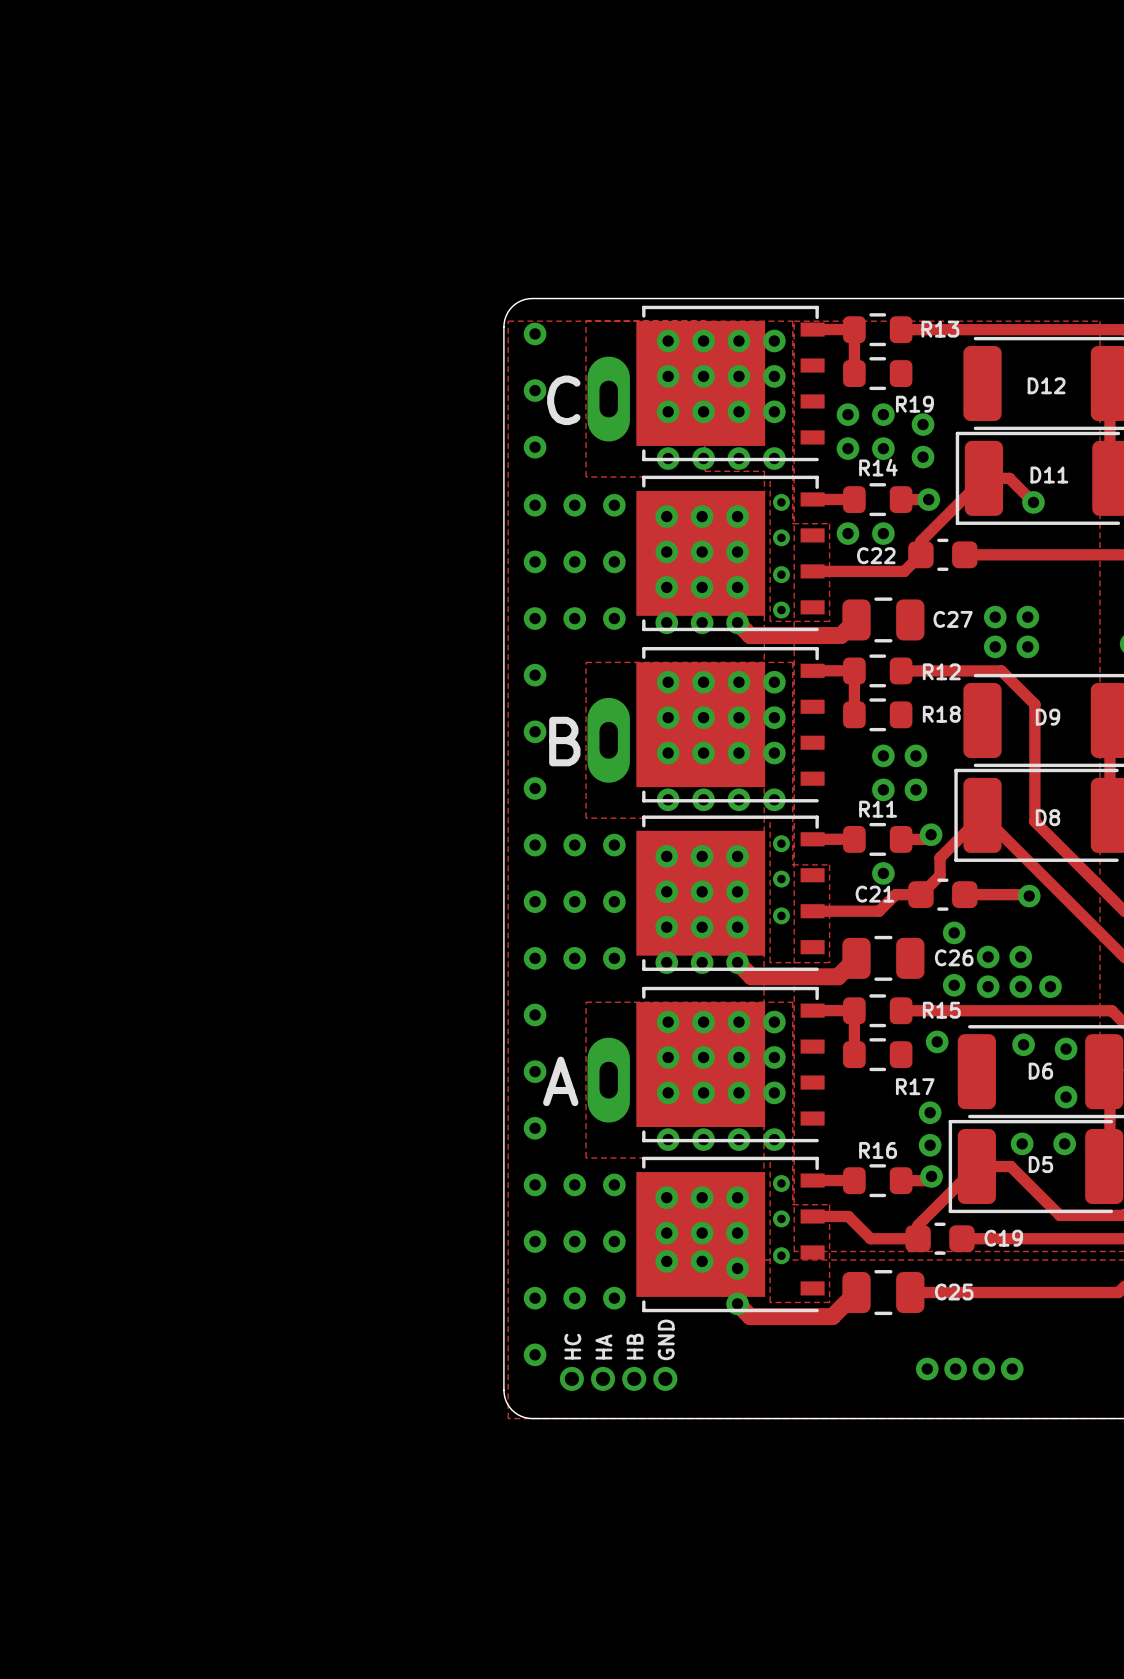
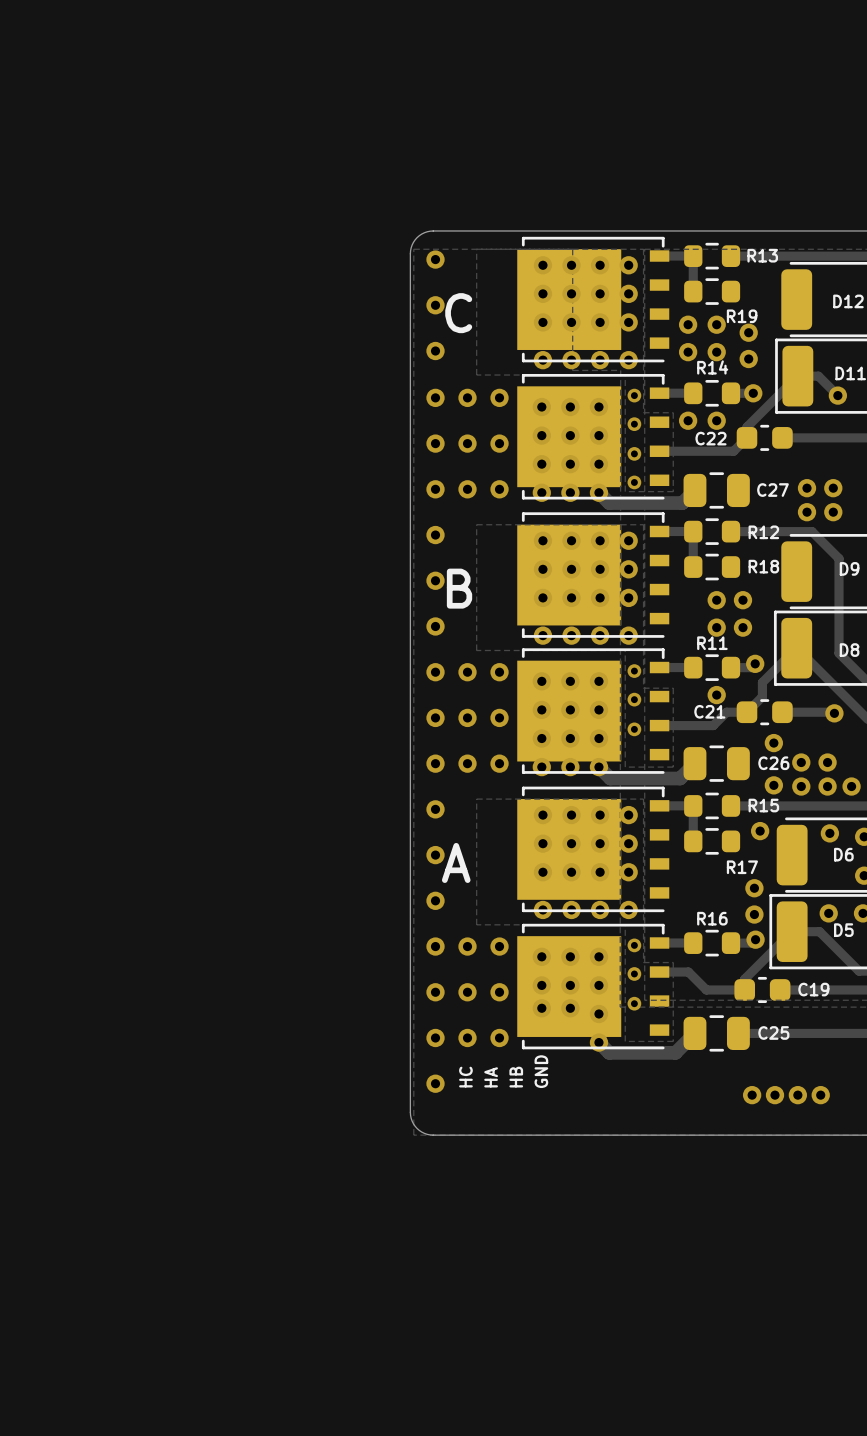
part: (608, 399) -> none
part: (608, 740) -> none
part: (608, 1080) -> none
part: (571, 1378) -> none
part: (603, 1378) -> none
part: (634, 1378) -> none
part: (665, 1378) -> none

